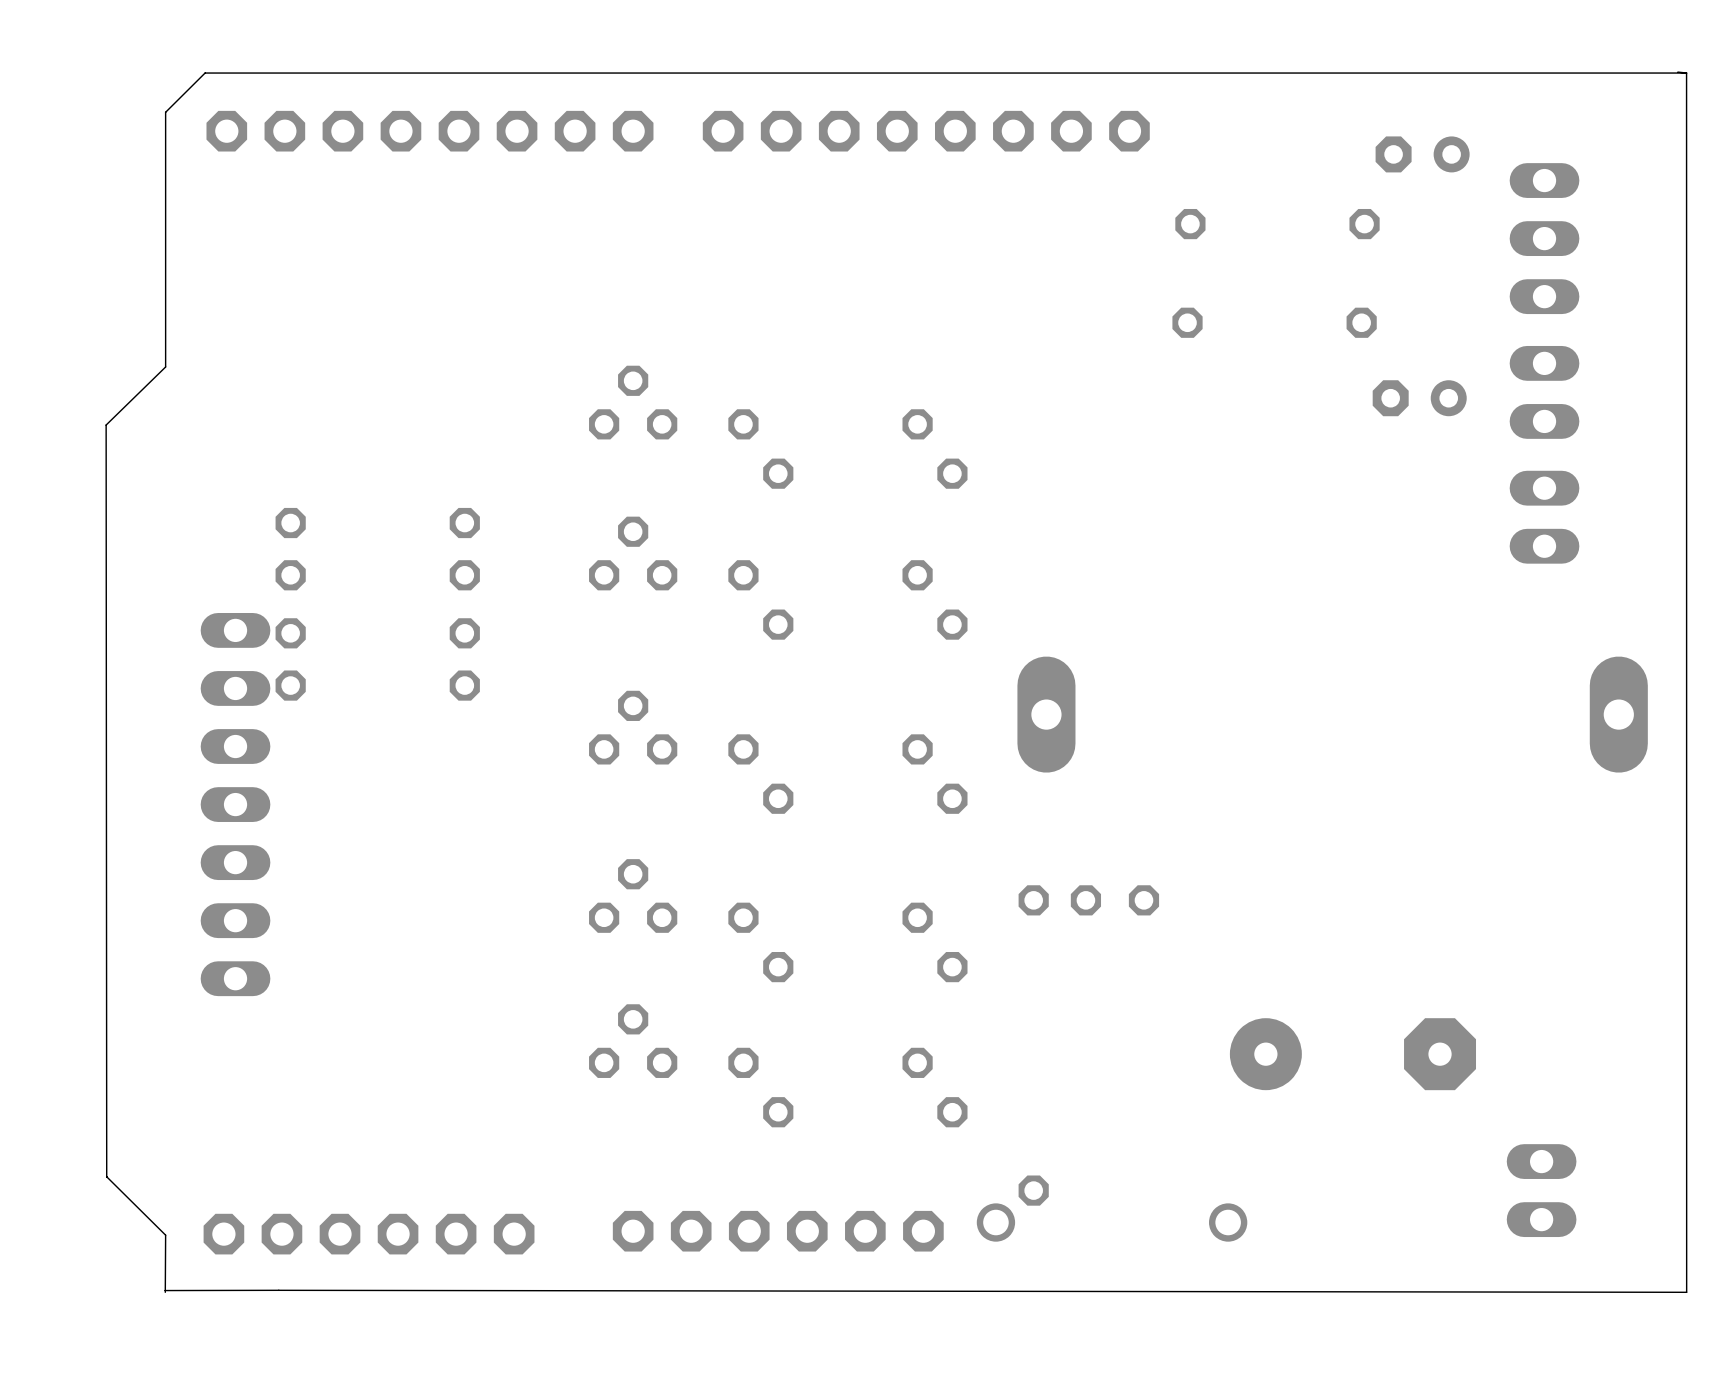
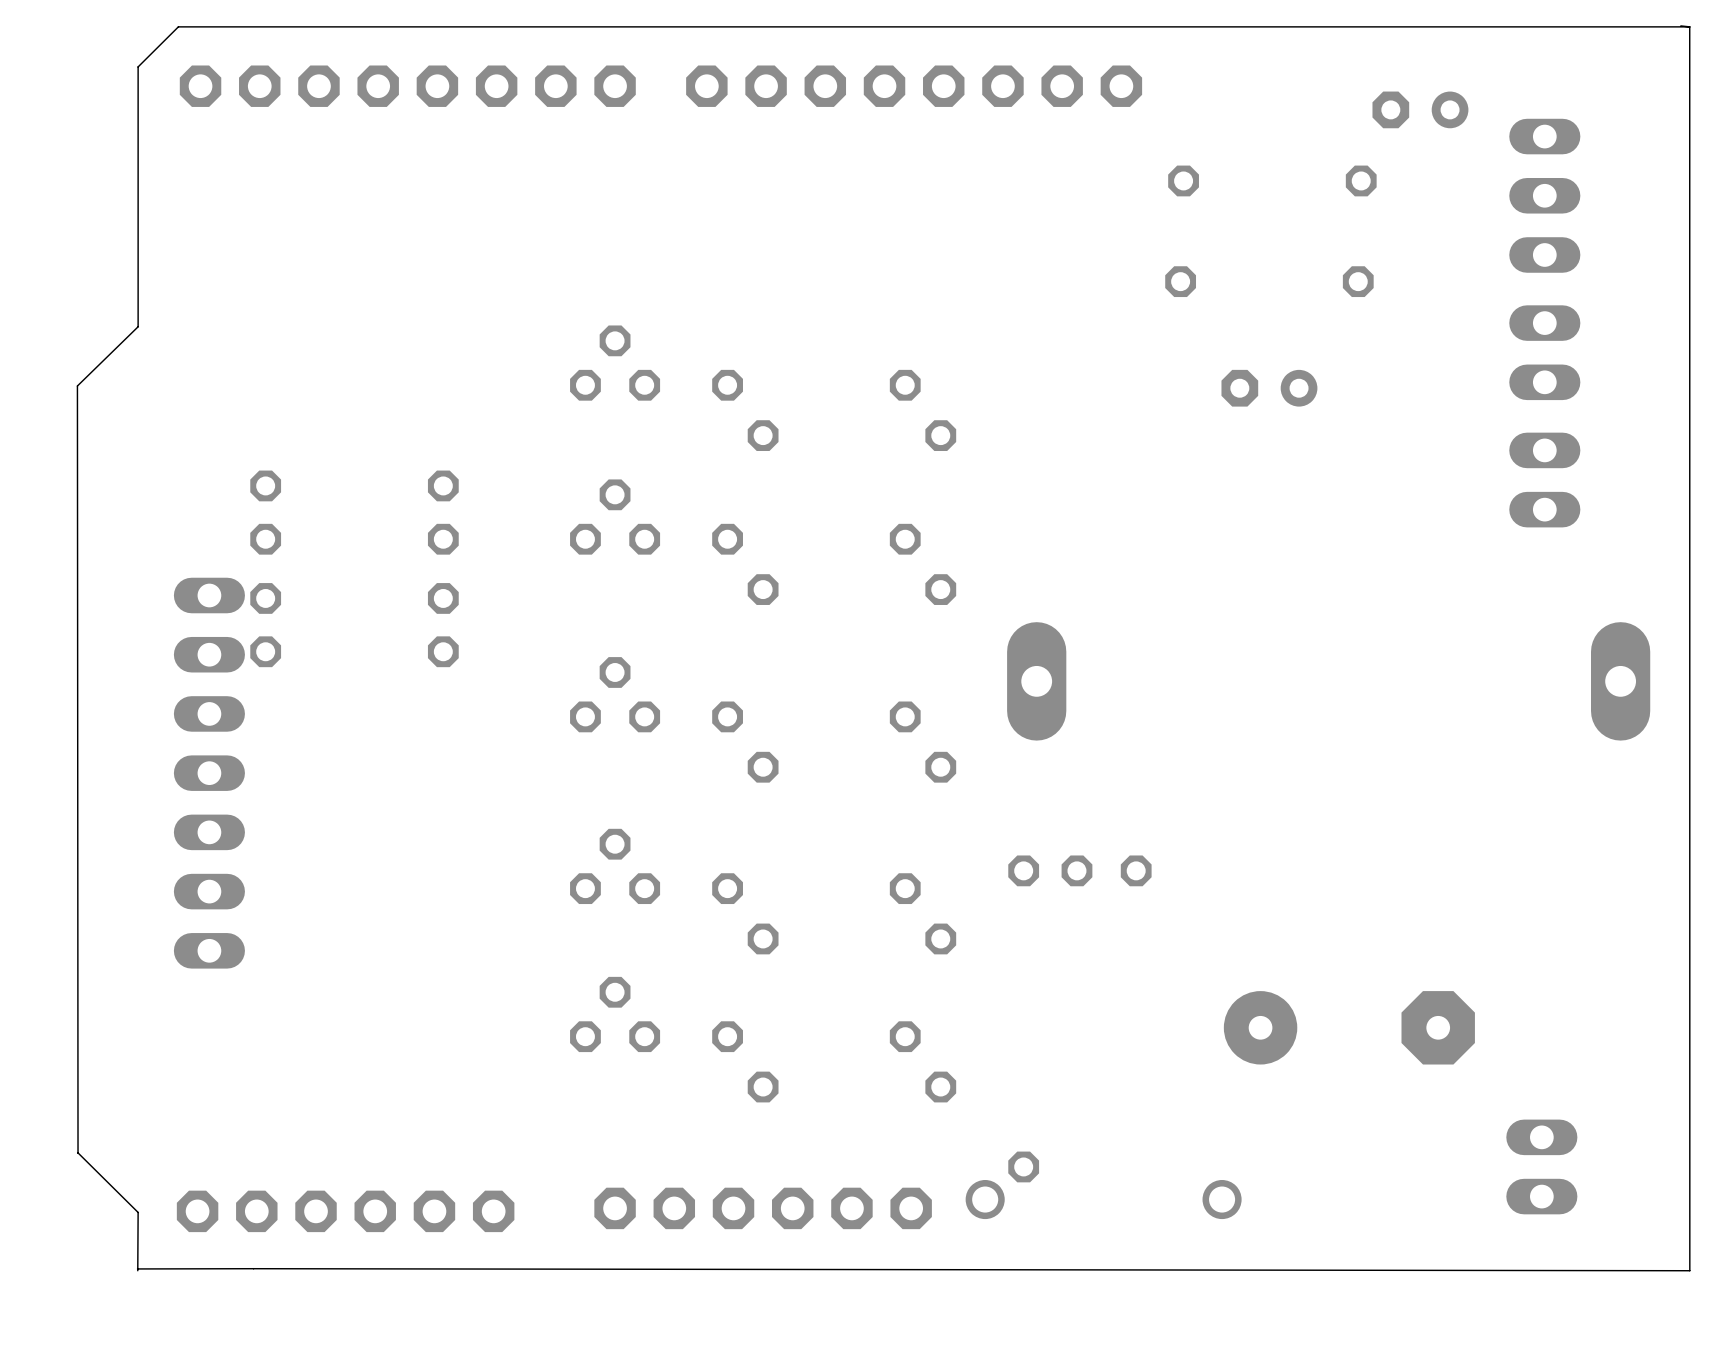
part position: (1419, 398) -> (1269, 388)

